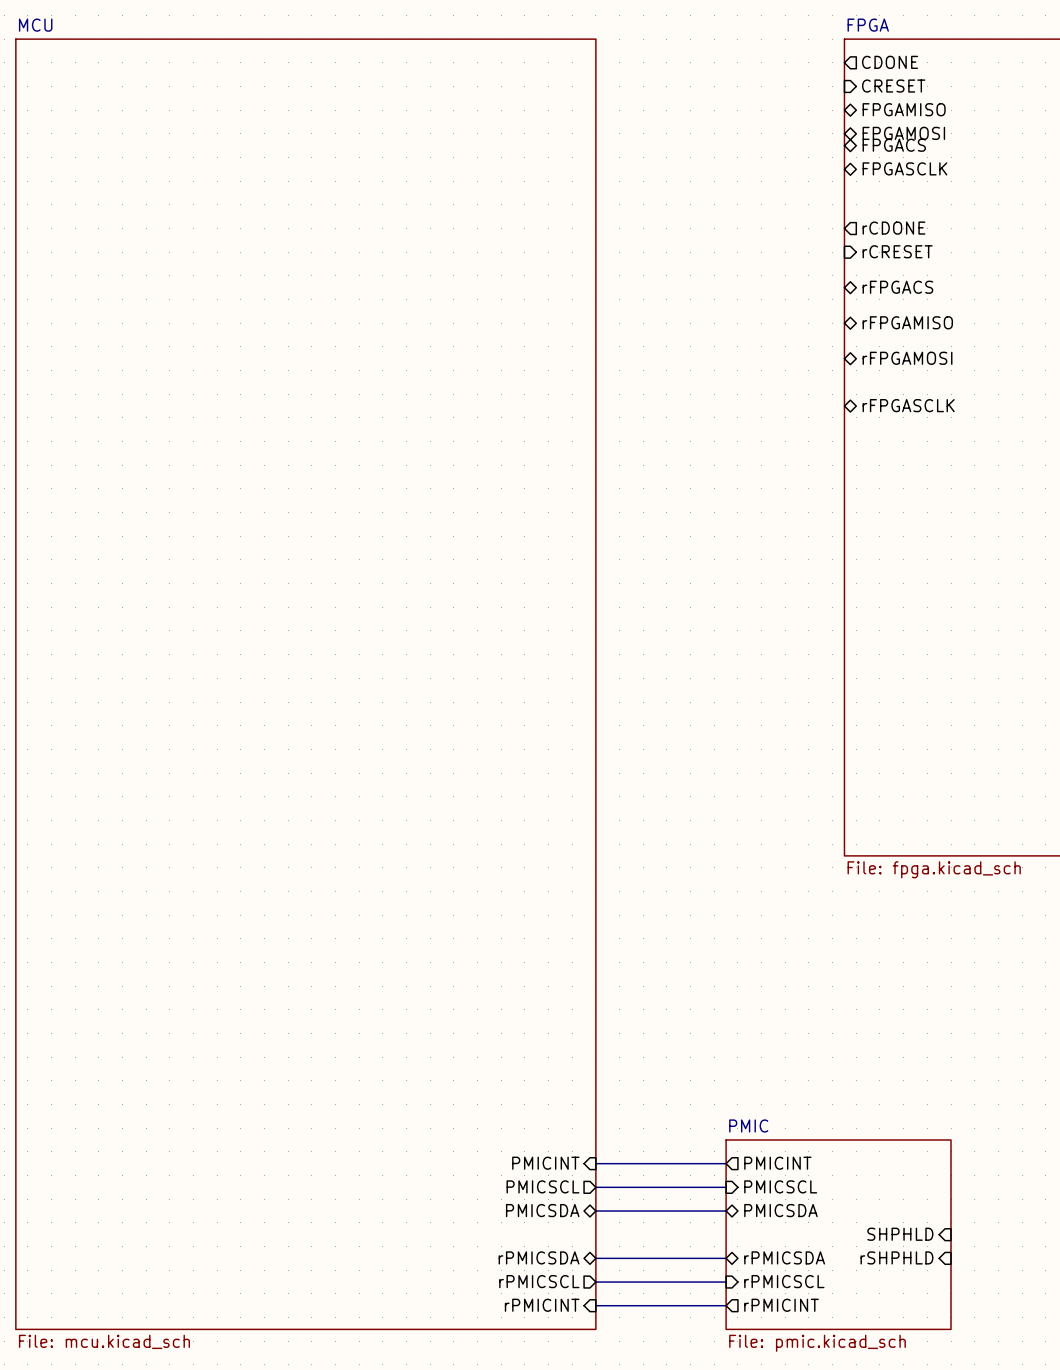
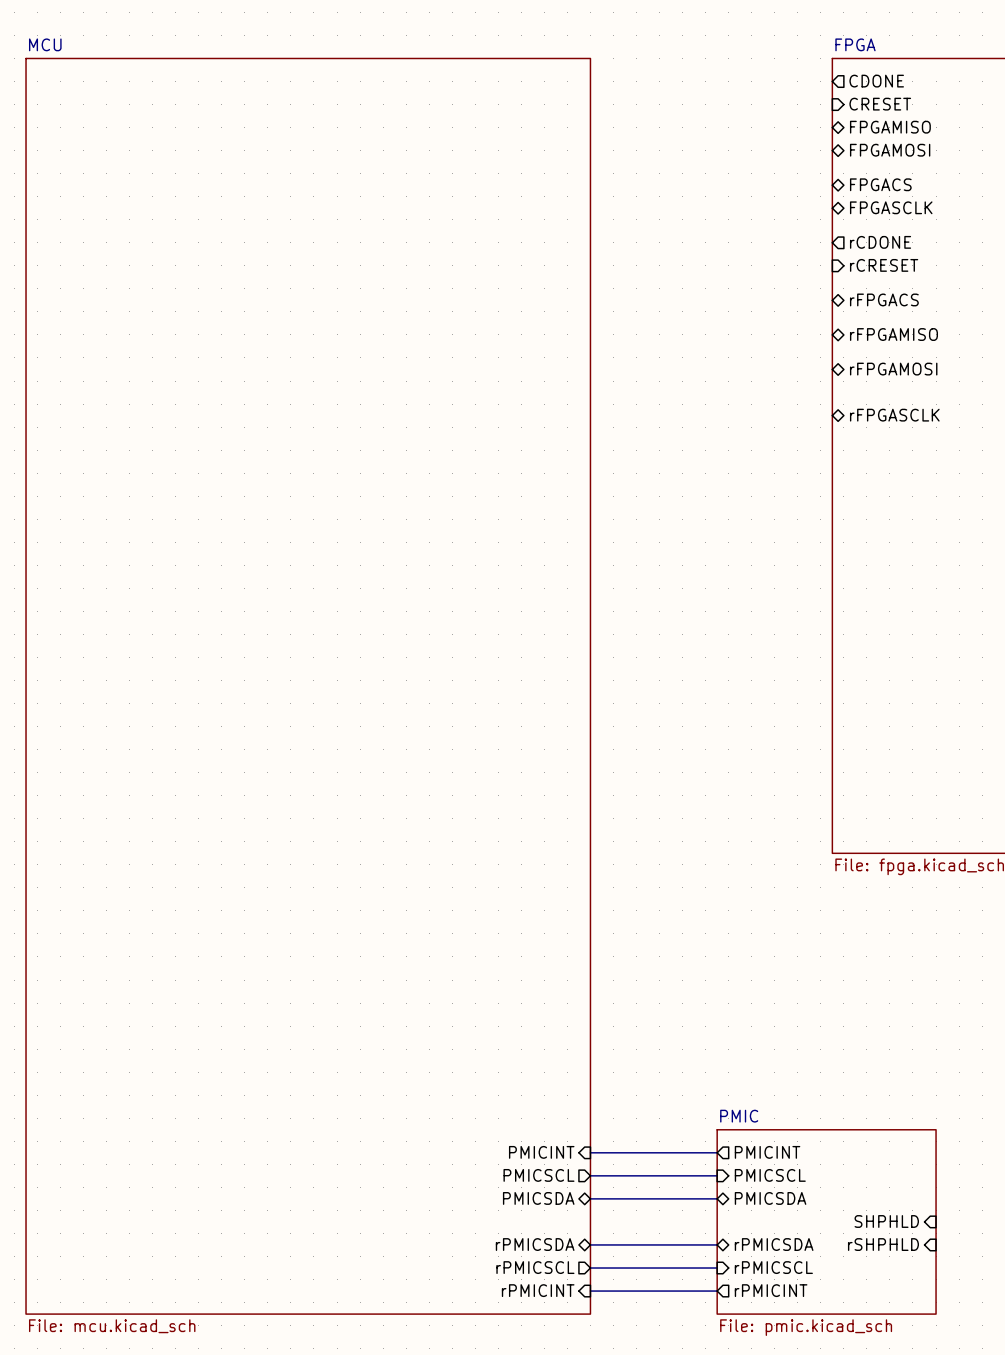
sheet pin: FPGACS (894, 145) -> none
sheet pin: FPGASCLK (904, 168) -> FPGACS (880, 184)
sheet pin: none -> FPGASCLK (891, 207)

